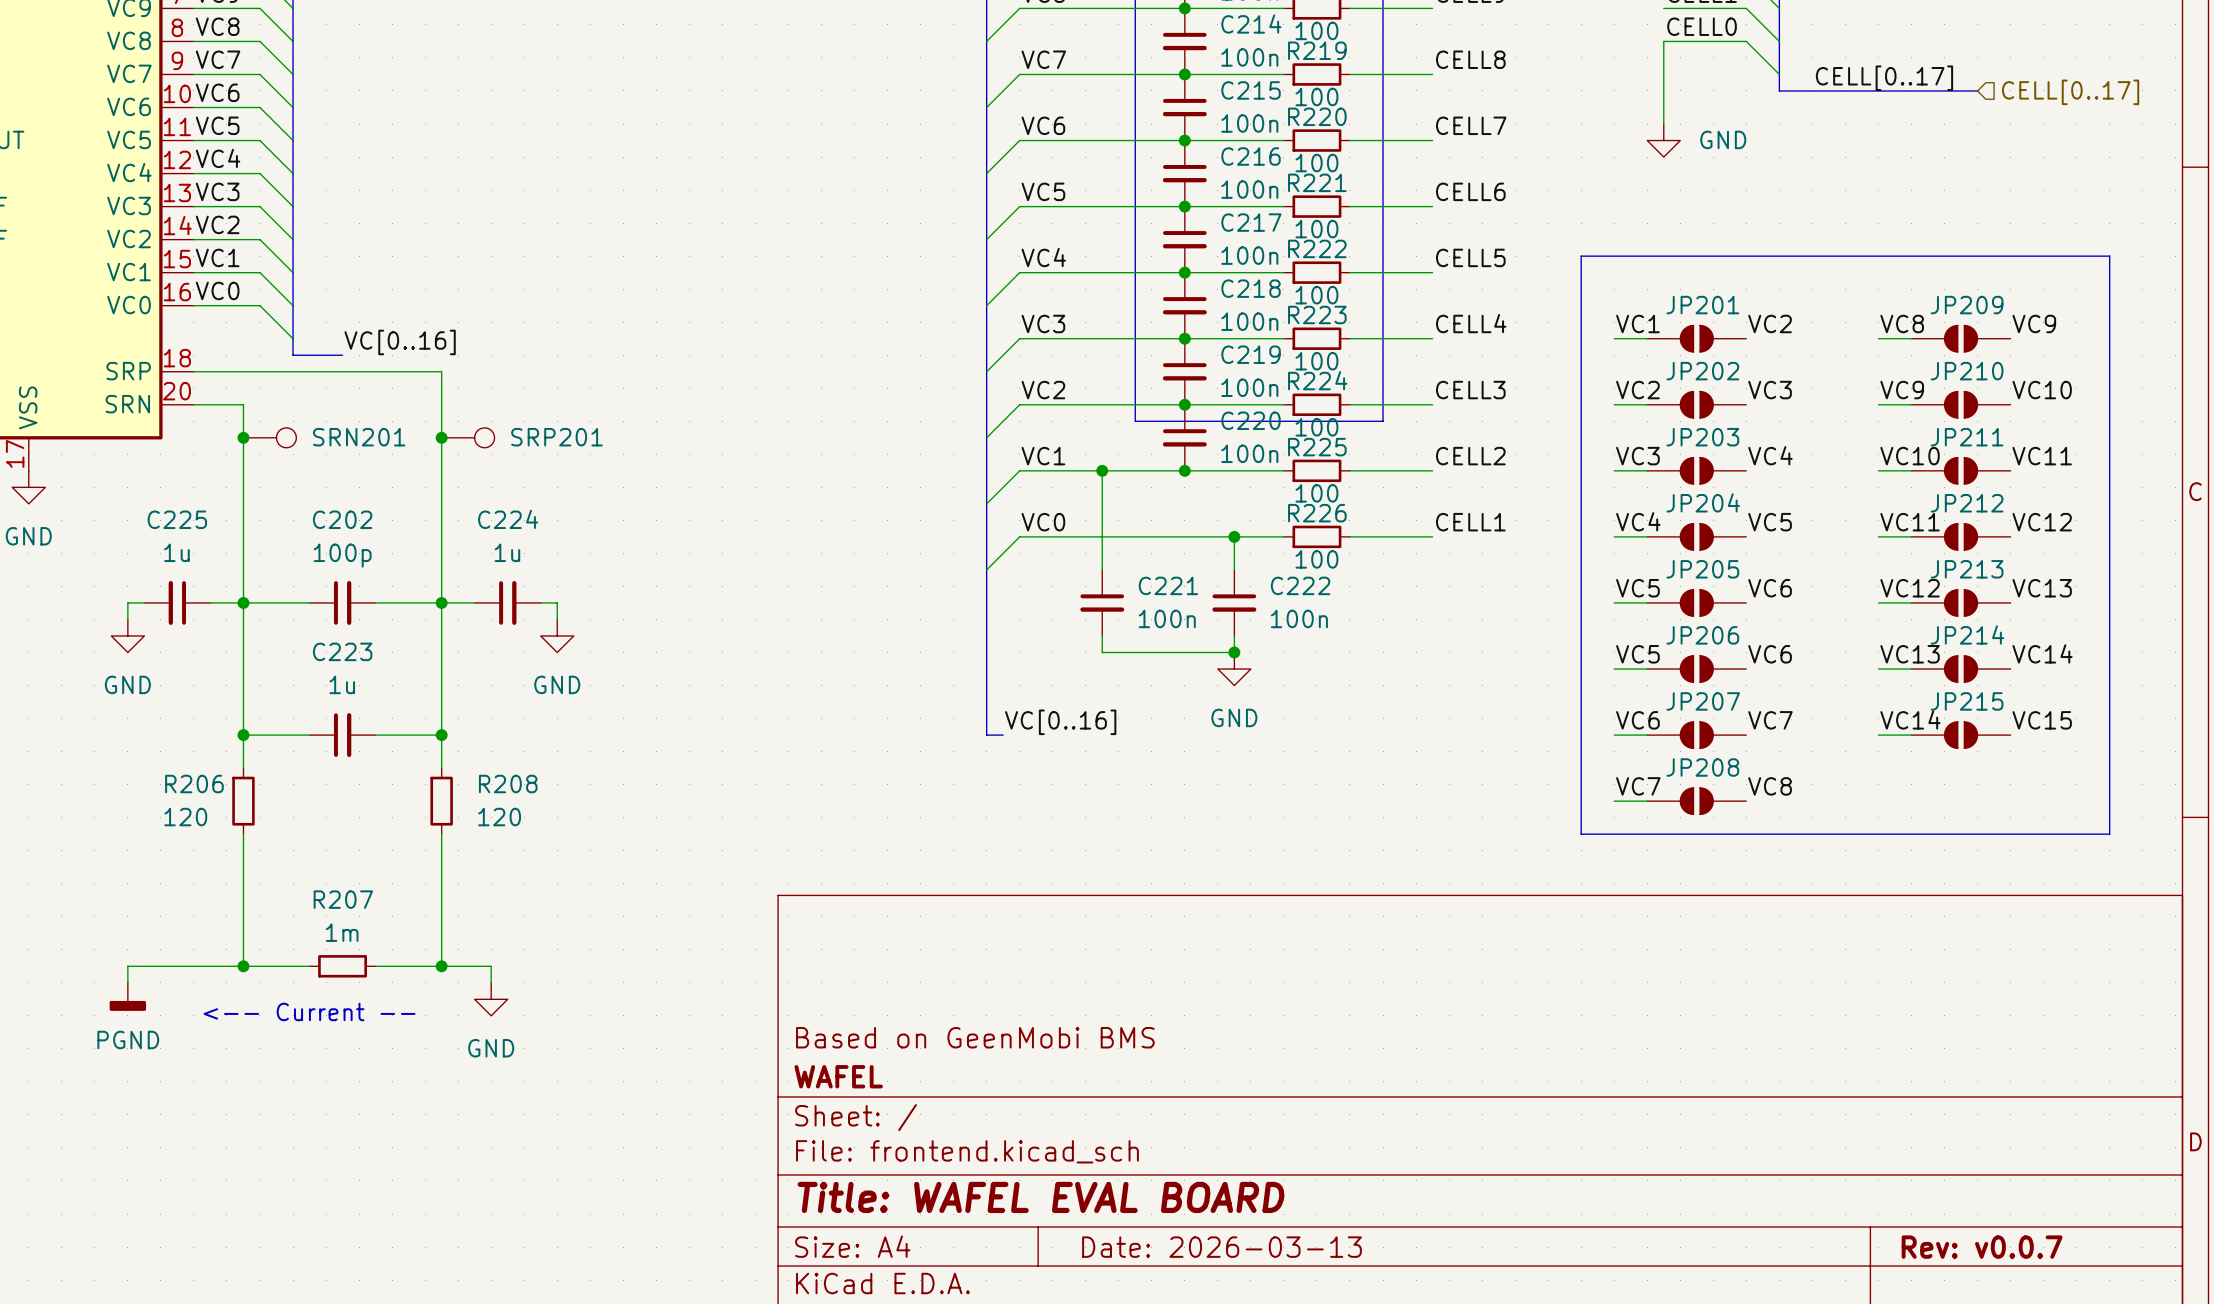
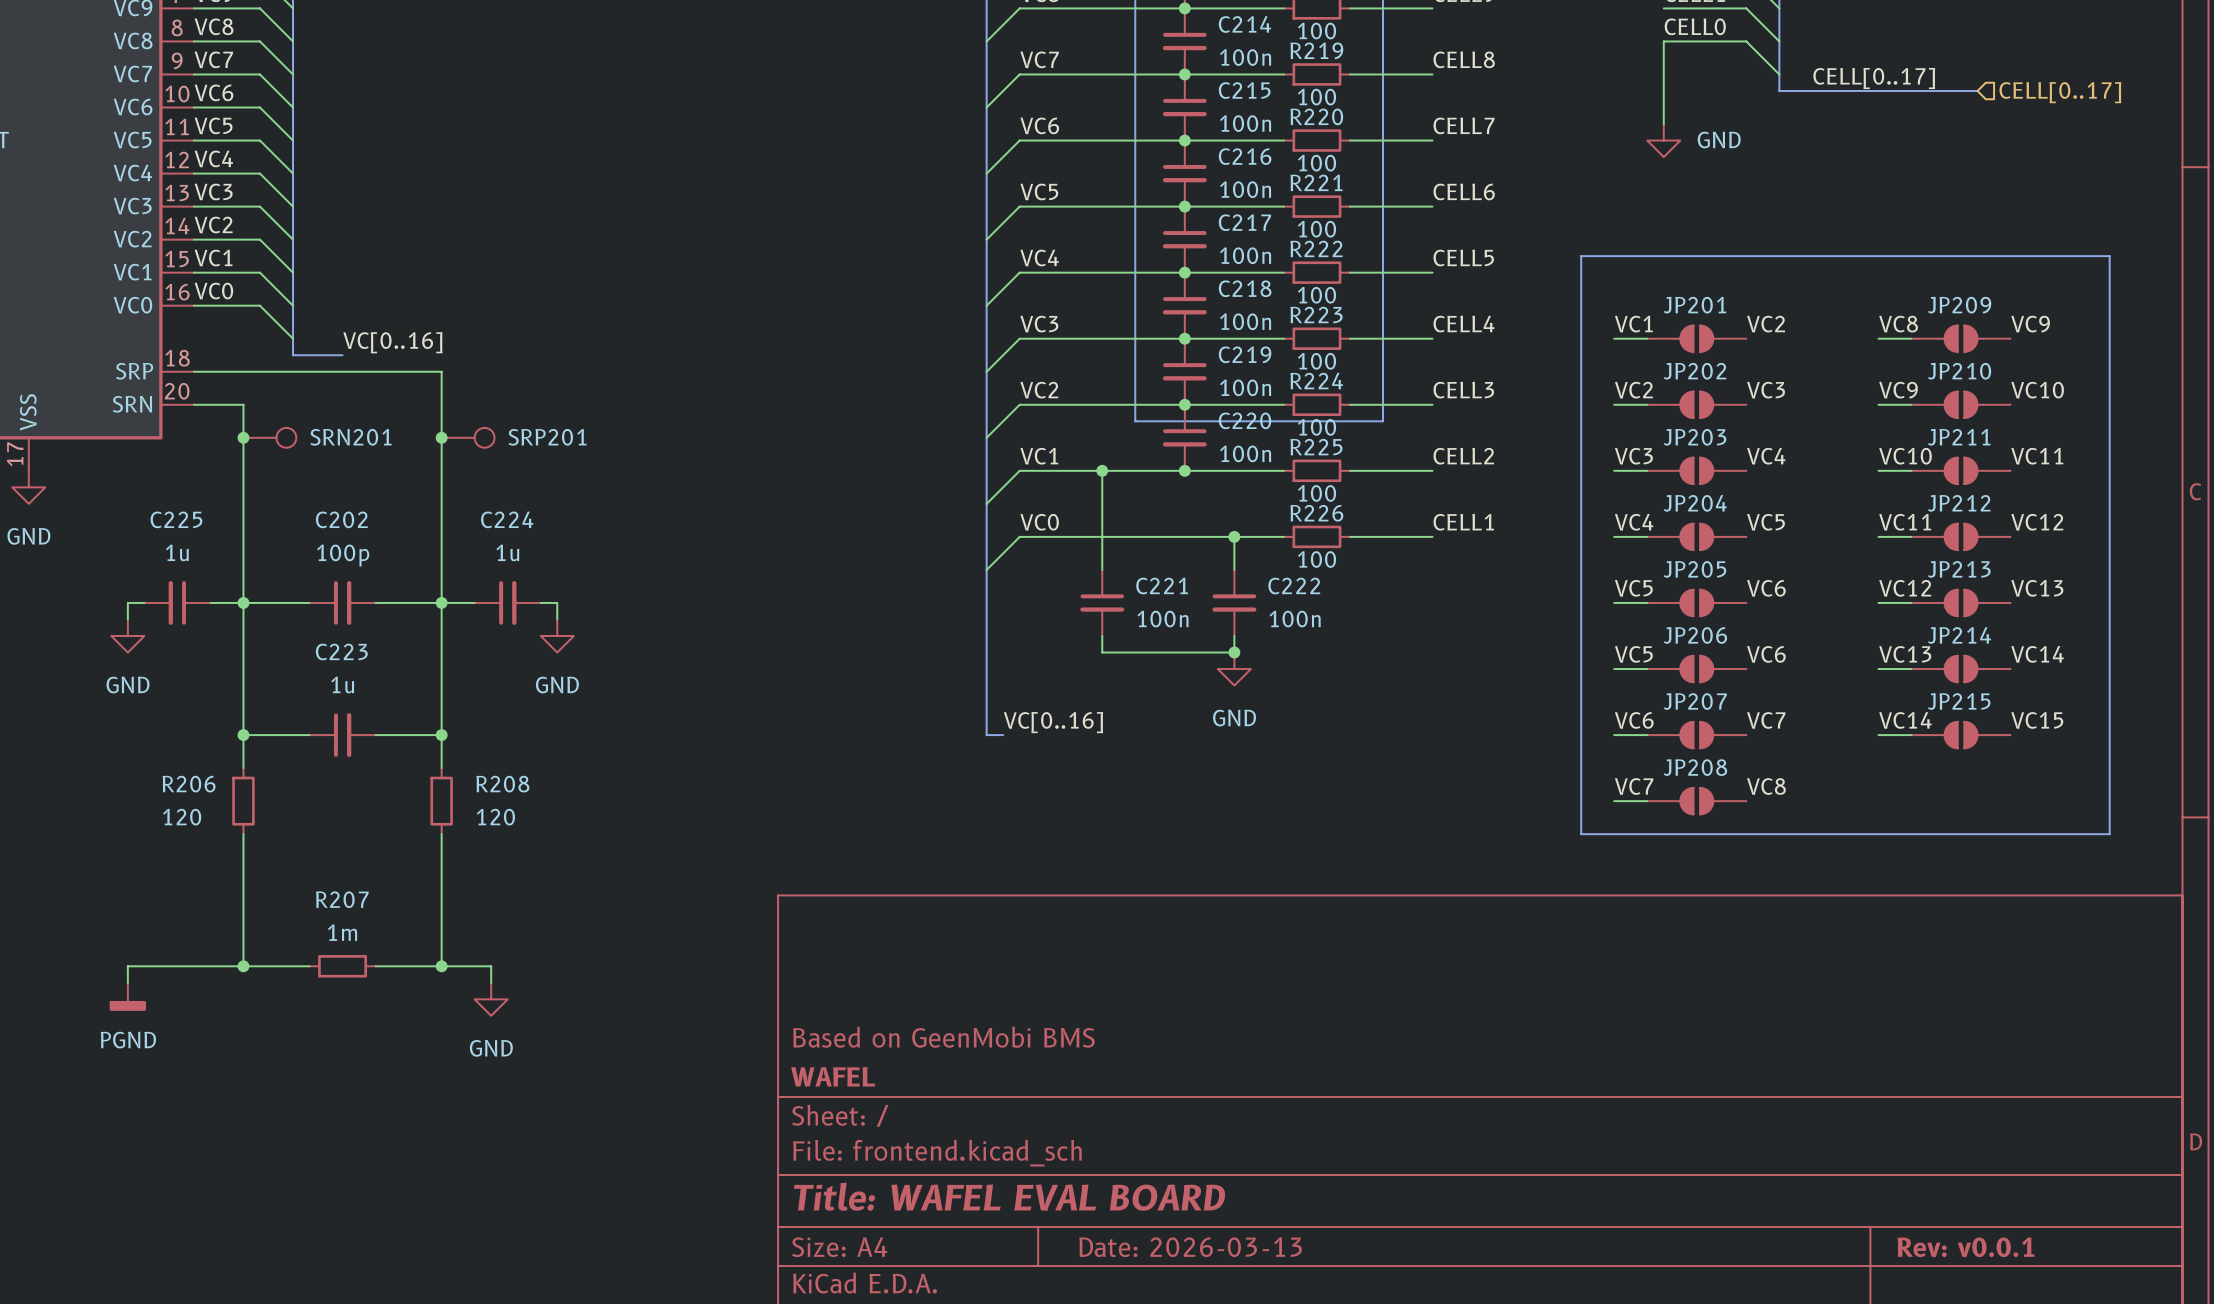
text: <-- Current -- (309, 1011) -> none
title block: Rev: v0.0.7 (1982, 1247) -> Rev: v0.0.1 (1965, 1247)

